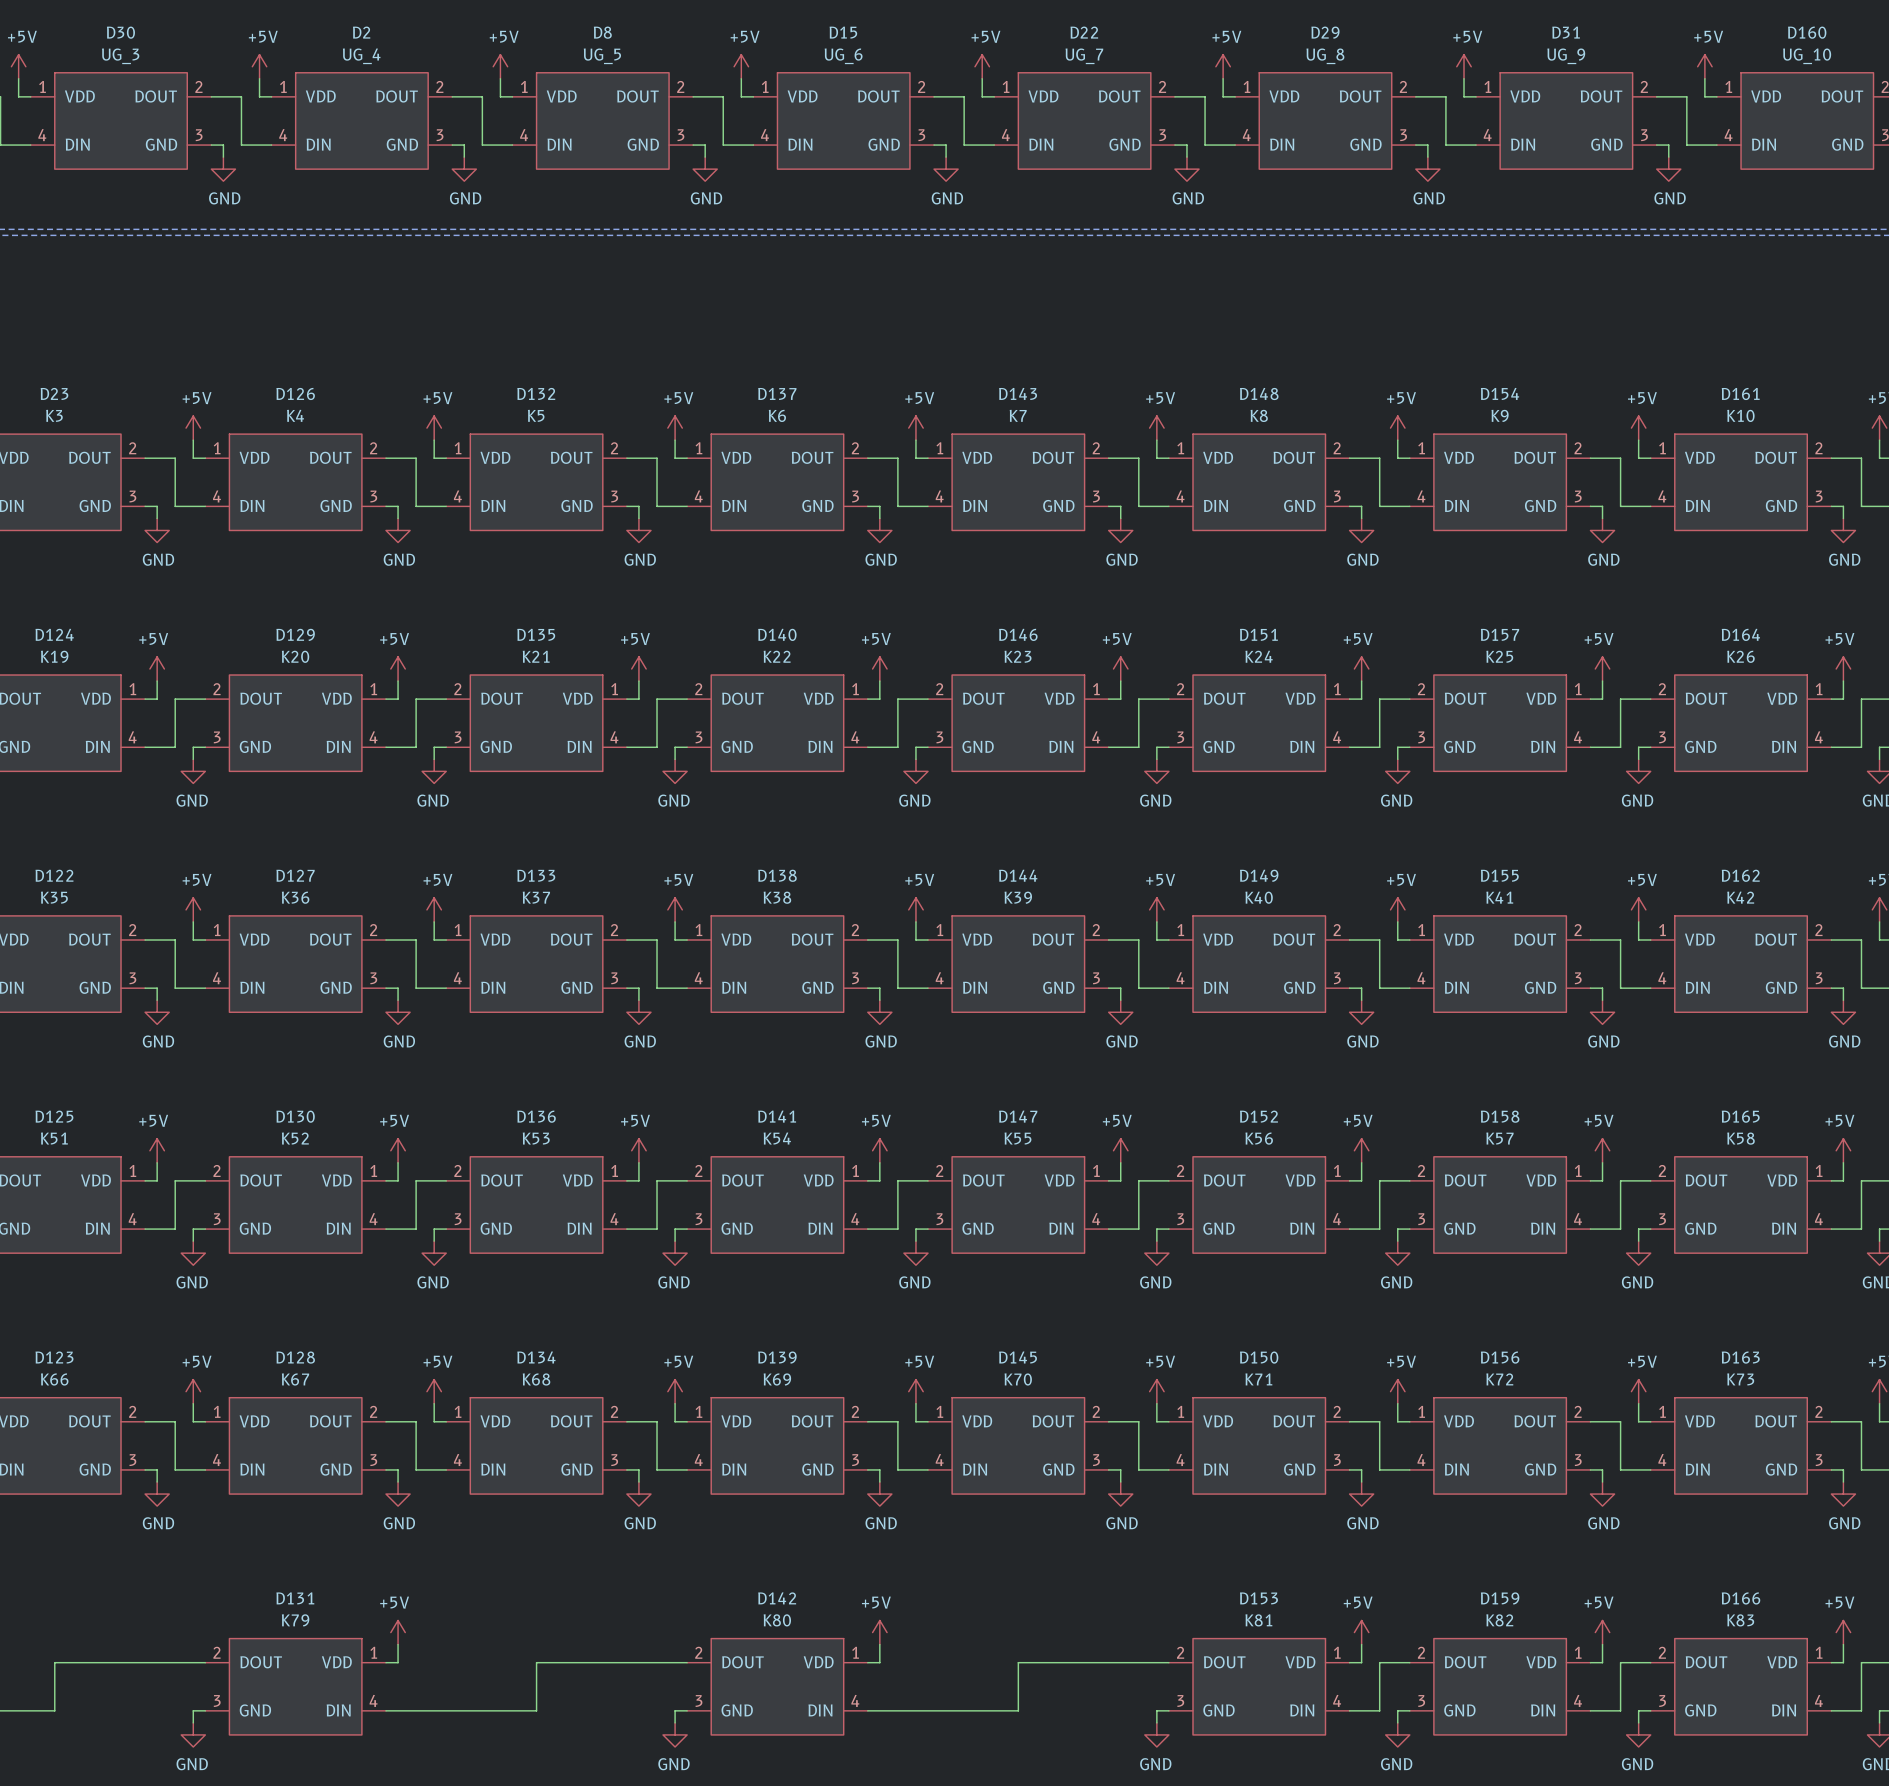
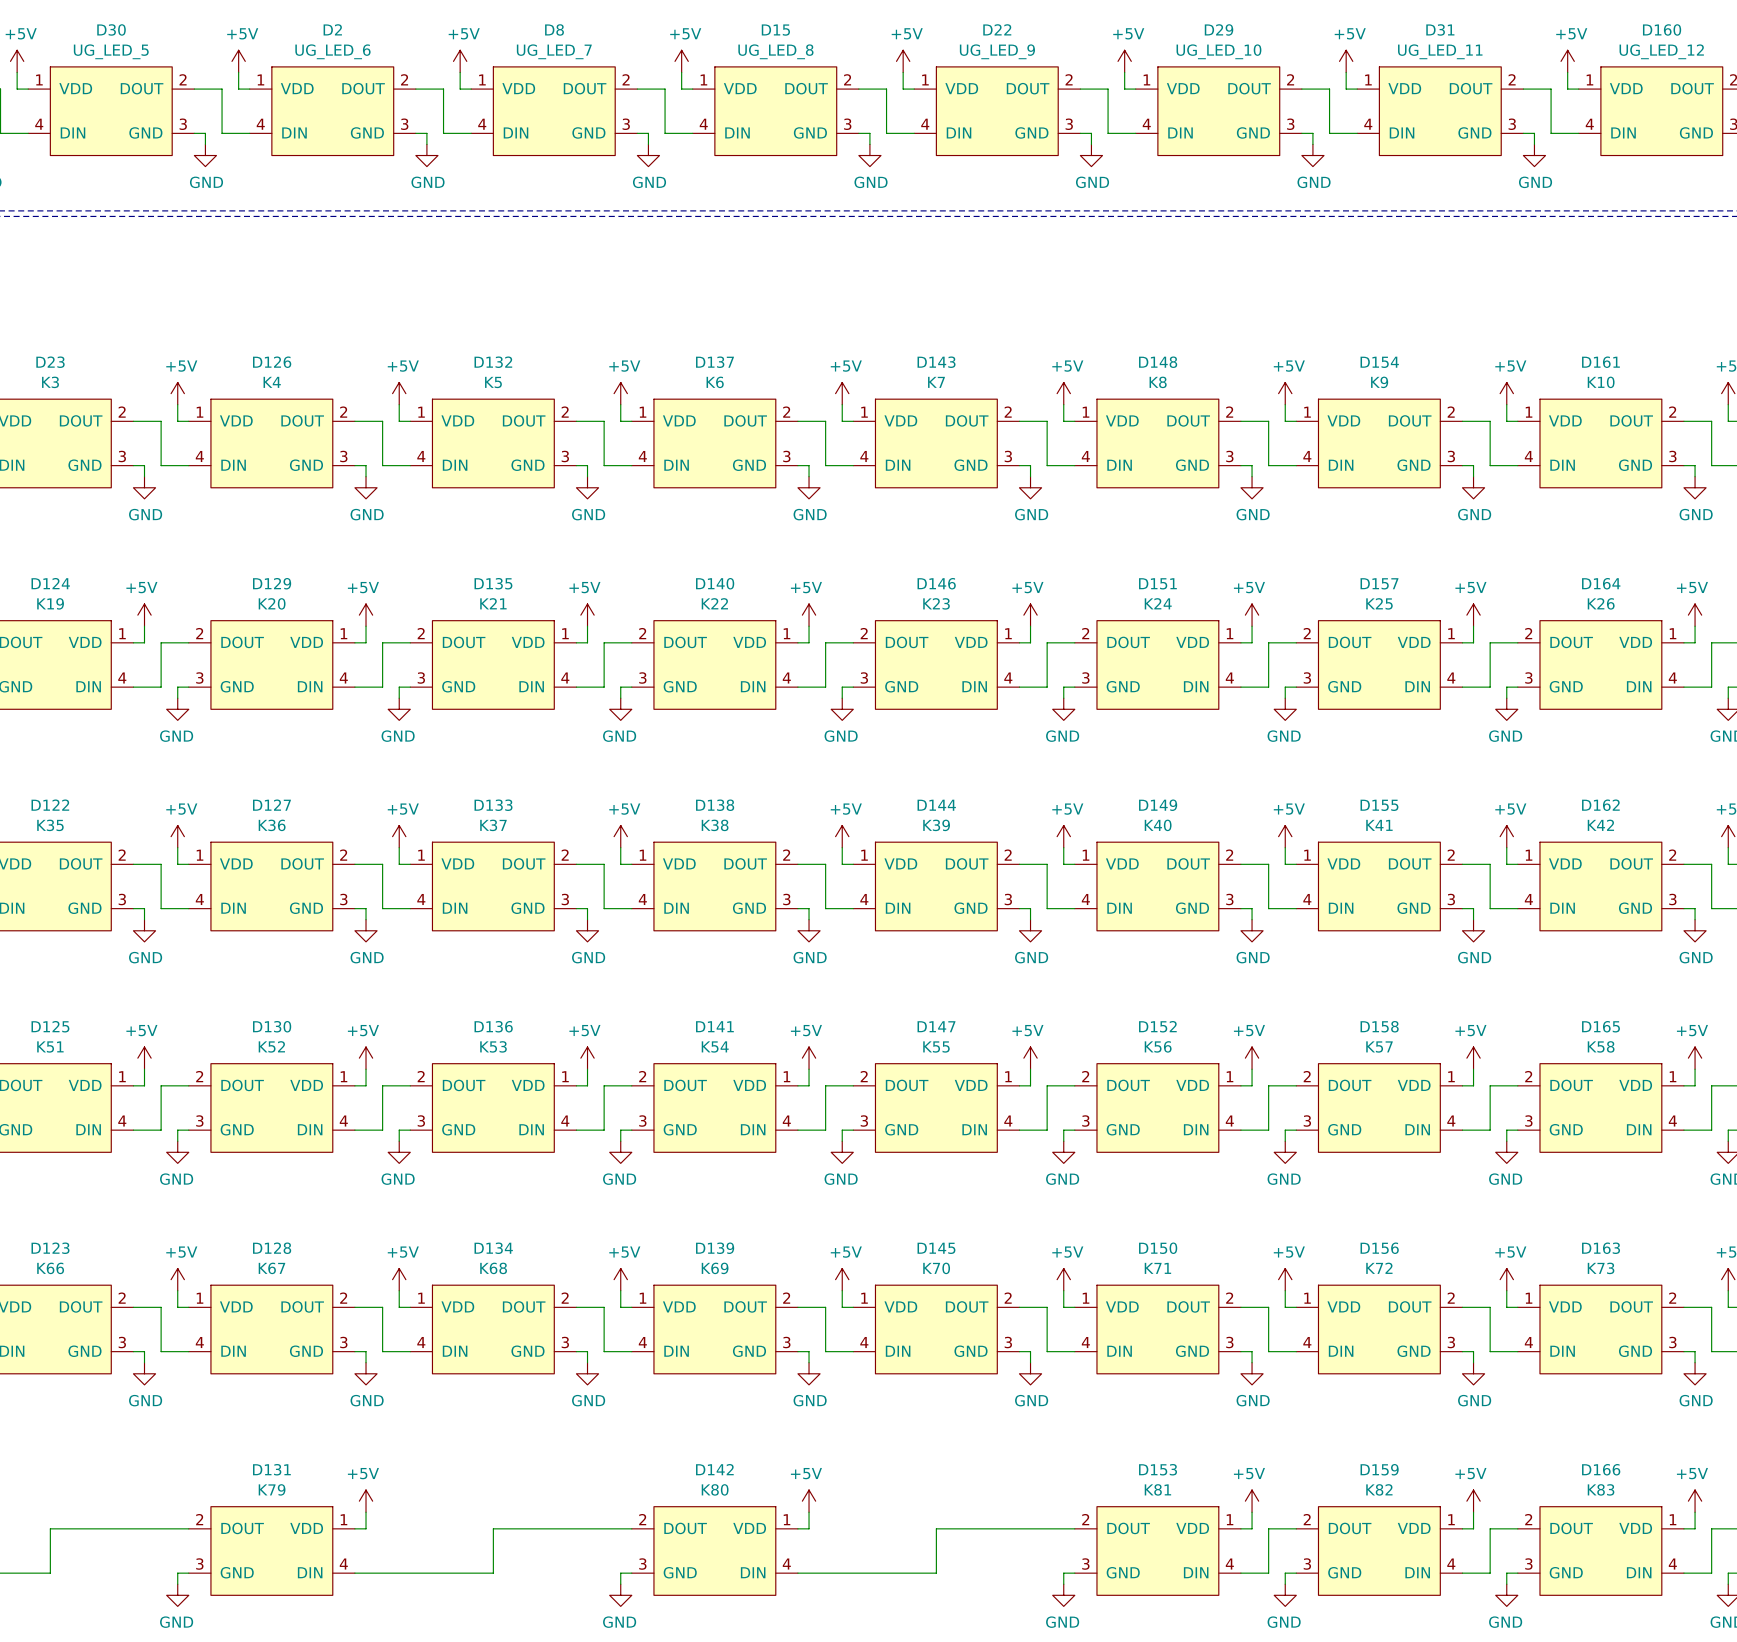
D30 value: UG_3 (120, 56) -> UG_LED_5 (111, 51)
D2 value: UG_4 (361, 56) -> UG_LED_6 (332, 51)
D8 value: UG_5 (602, 56) -> UG_LED_7 (554, 51)
D15 value: UG_6 (843, 56) -> UG_LED_8 (775, 51)
D22 value: UG_7 (1084, 56) -> UG_LED_9 (997, 51)
D29 value: UG_8 (1325, 56) -> UG_LED_10 (1218, 51)
D31 value: UG_9 (1566, 56) -> UG_LED_11 (1440, 51)
D160 value: UG_10 (1807, 56) -> UG_LED_12 (1661, 51)

